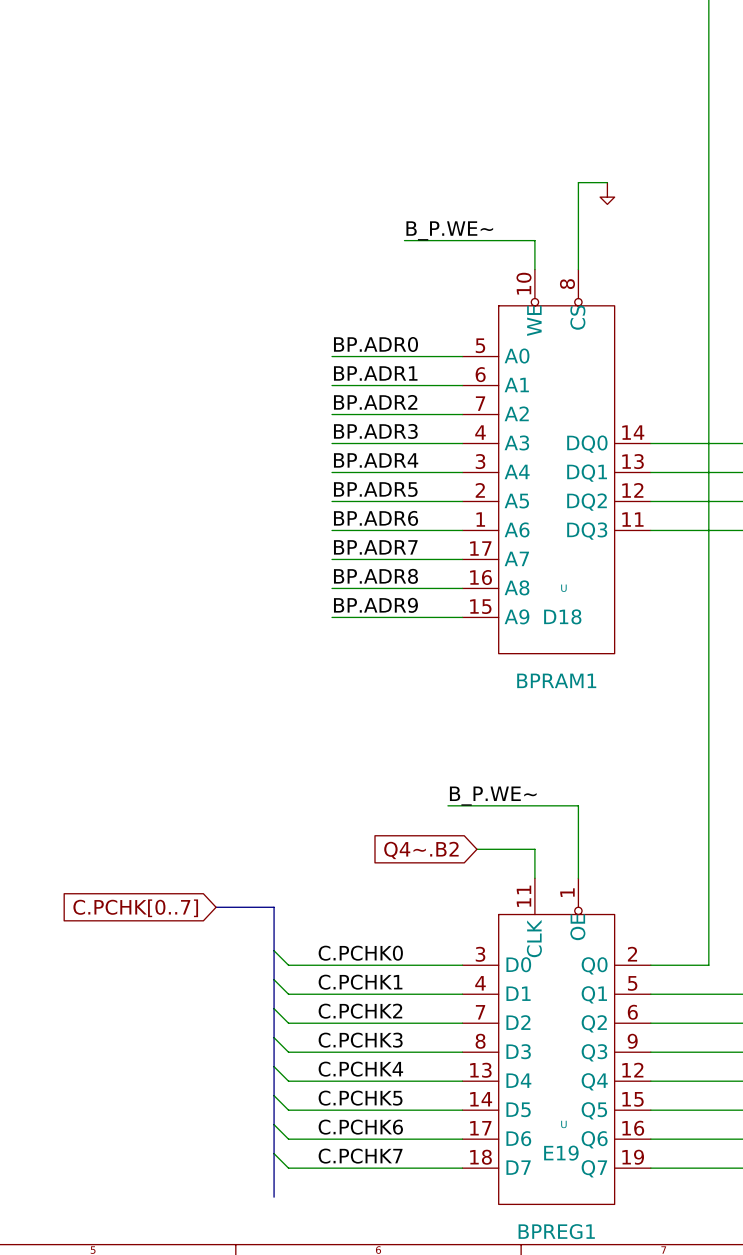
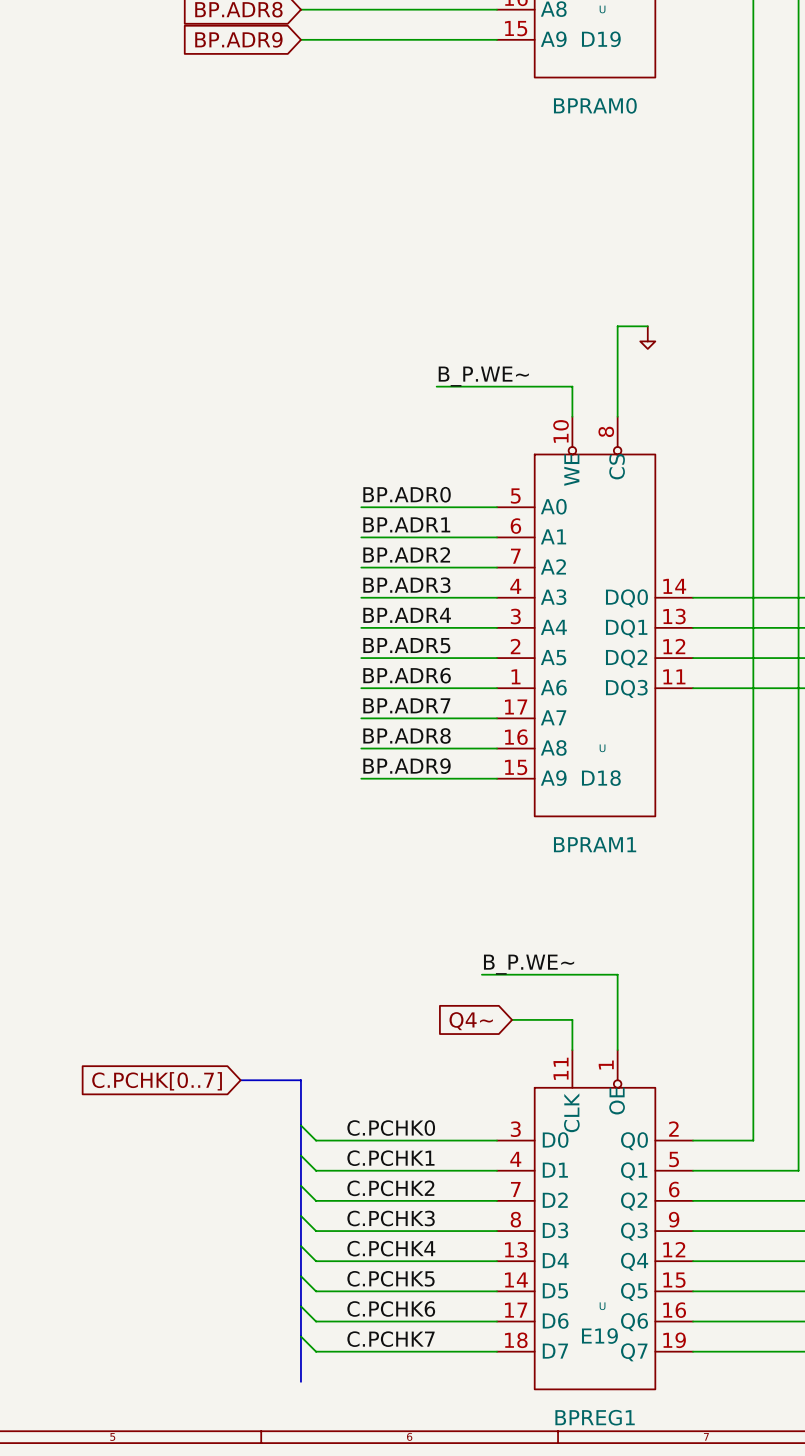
global label: Q4~.B2 (421, 850) -> Q4~ (471, 1021)

